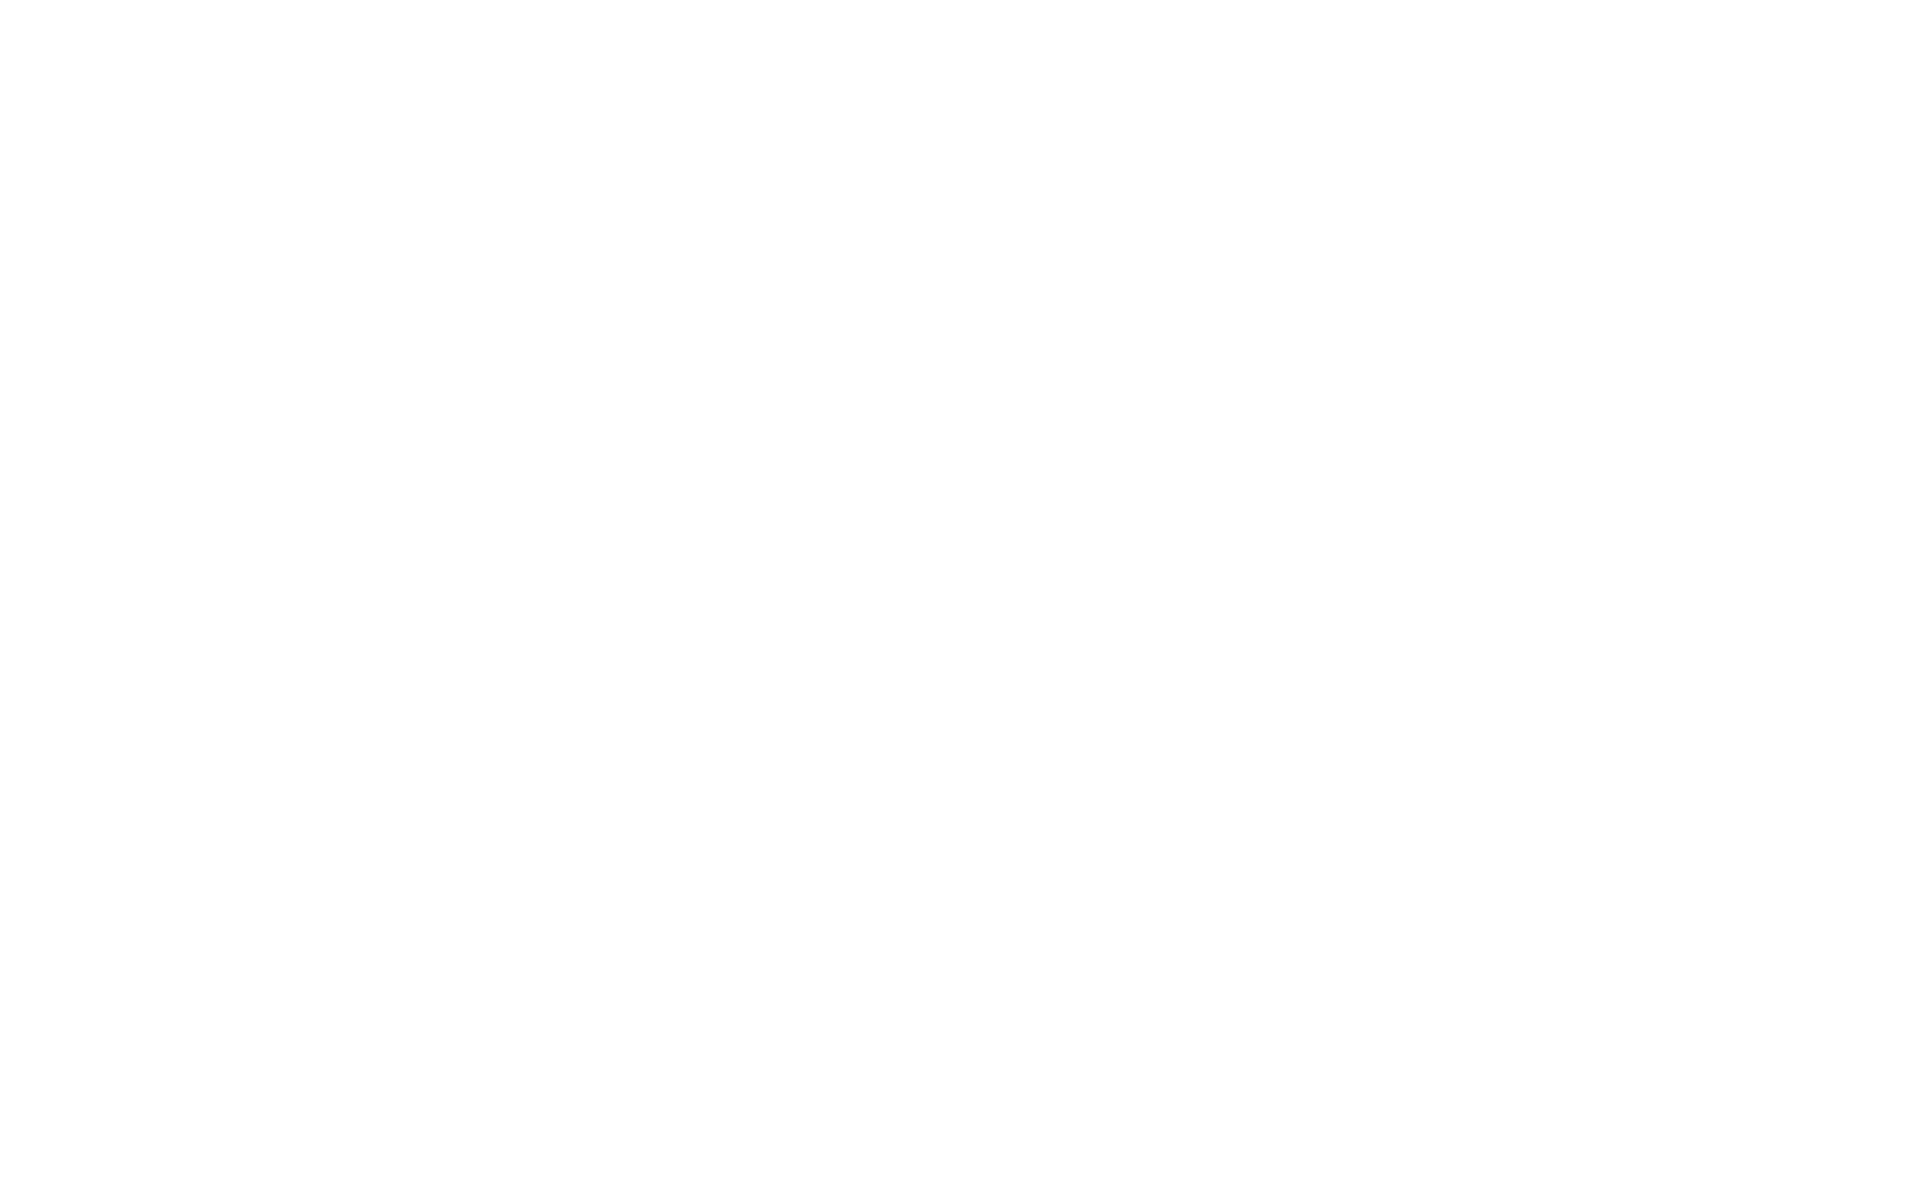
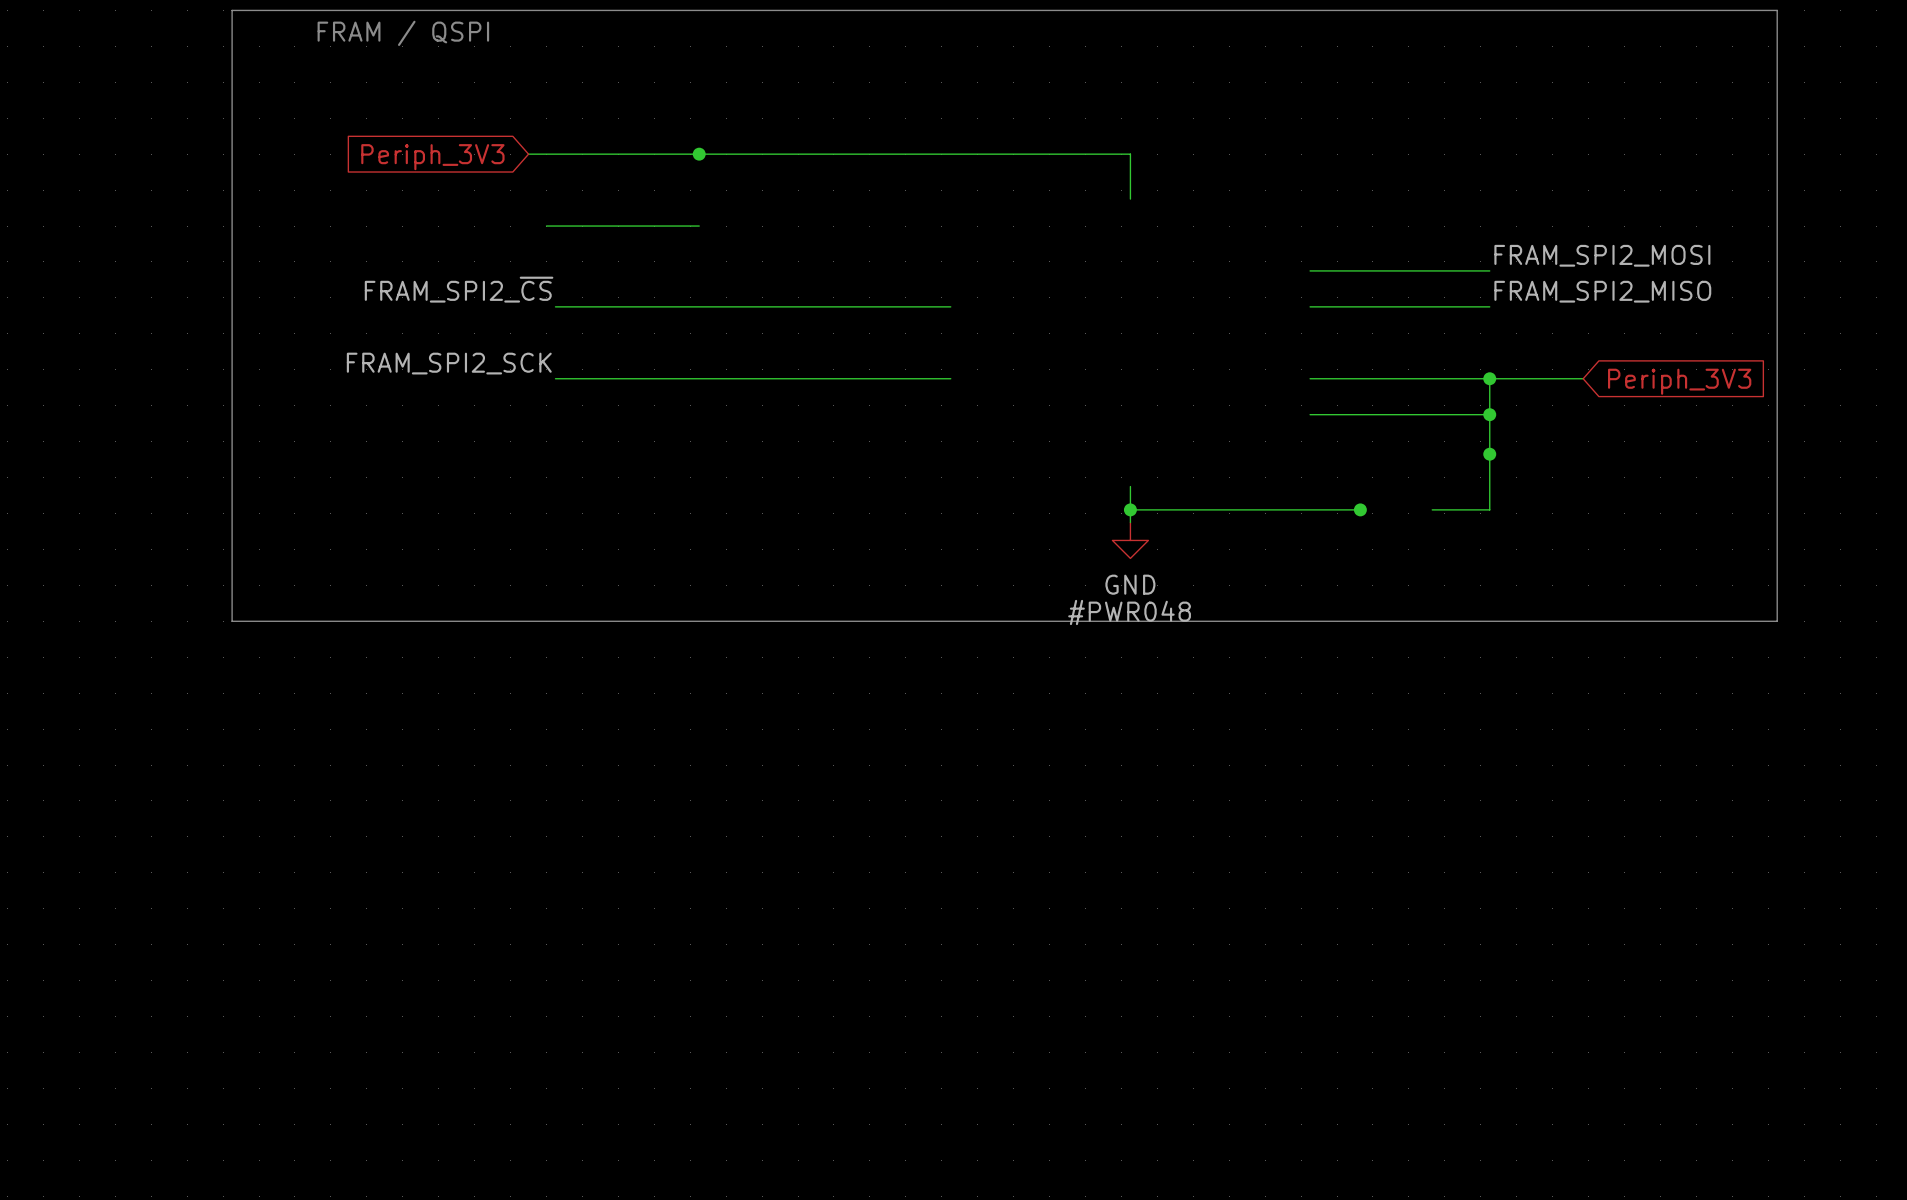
line: none -> (232, 10) (1777, 10) (1777, 621) (232, 621) (232, 10)
text: none -> FRAM / QSPI (403, 33)
wire: none -> (528, 154) (1130, 154) (1130, 199)
junction: none -> (699, 154)
global label: none -> Periph_3V3 (432, 157)
wire: none -> (546, 226) (699, 226)
label: none -> FRAM_SPI2_MOSI (1602, 255)
wire: none -> (1310, 270) (1489, 270)
label: none -> FRAM_SPI2_~{CS} (459, 289)
label: none -> FRAM_SPI2_MISO (1602, 291)
wire: none -> (555, 306) (950, 306)
wire: none -> (1310, 306) (1489, 306)
label: none -> FRAM_SPI2_SCK (449, 363)
wire: none -> (555, 378) (950, 378)
wire: none -> (1310, 378) (1583, 378)
wire: none -> (1489, 378) (1489, 509) (1432, 509)
junction: none -> (1489, 378)
global label: none -> Periph_3V3 (1679, 381)
wire: none -> (1310, 414) (1489, 414)
junction: none -> (1489, 414)
junction: none -> (1489, 454)
wire: none -> (1130, 486) (1130, 522)
wire: none -> (1130, 509) (1362, 509)
junction: none -> (1130, 509)
junction: none -> (1360, 509)
#PWR048: none -> GND (1130, 540)

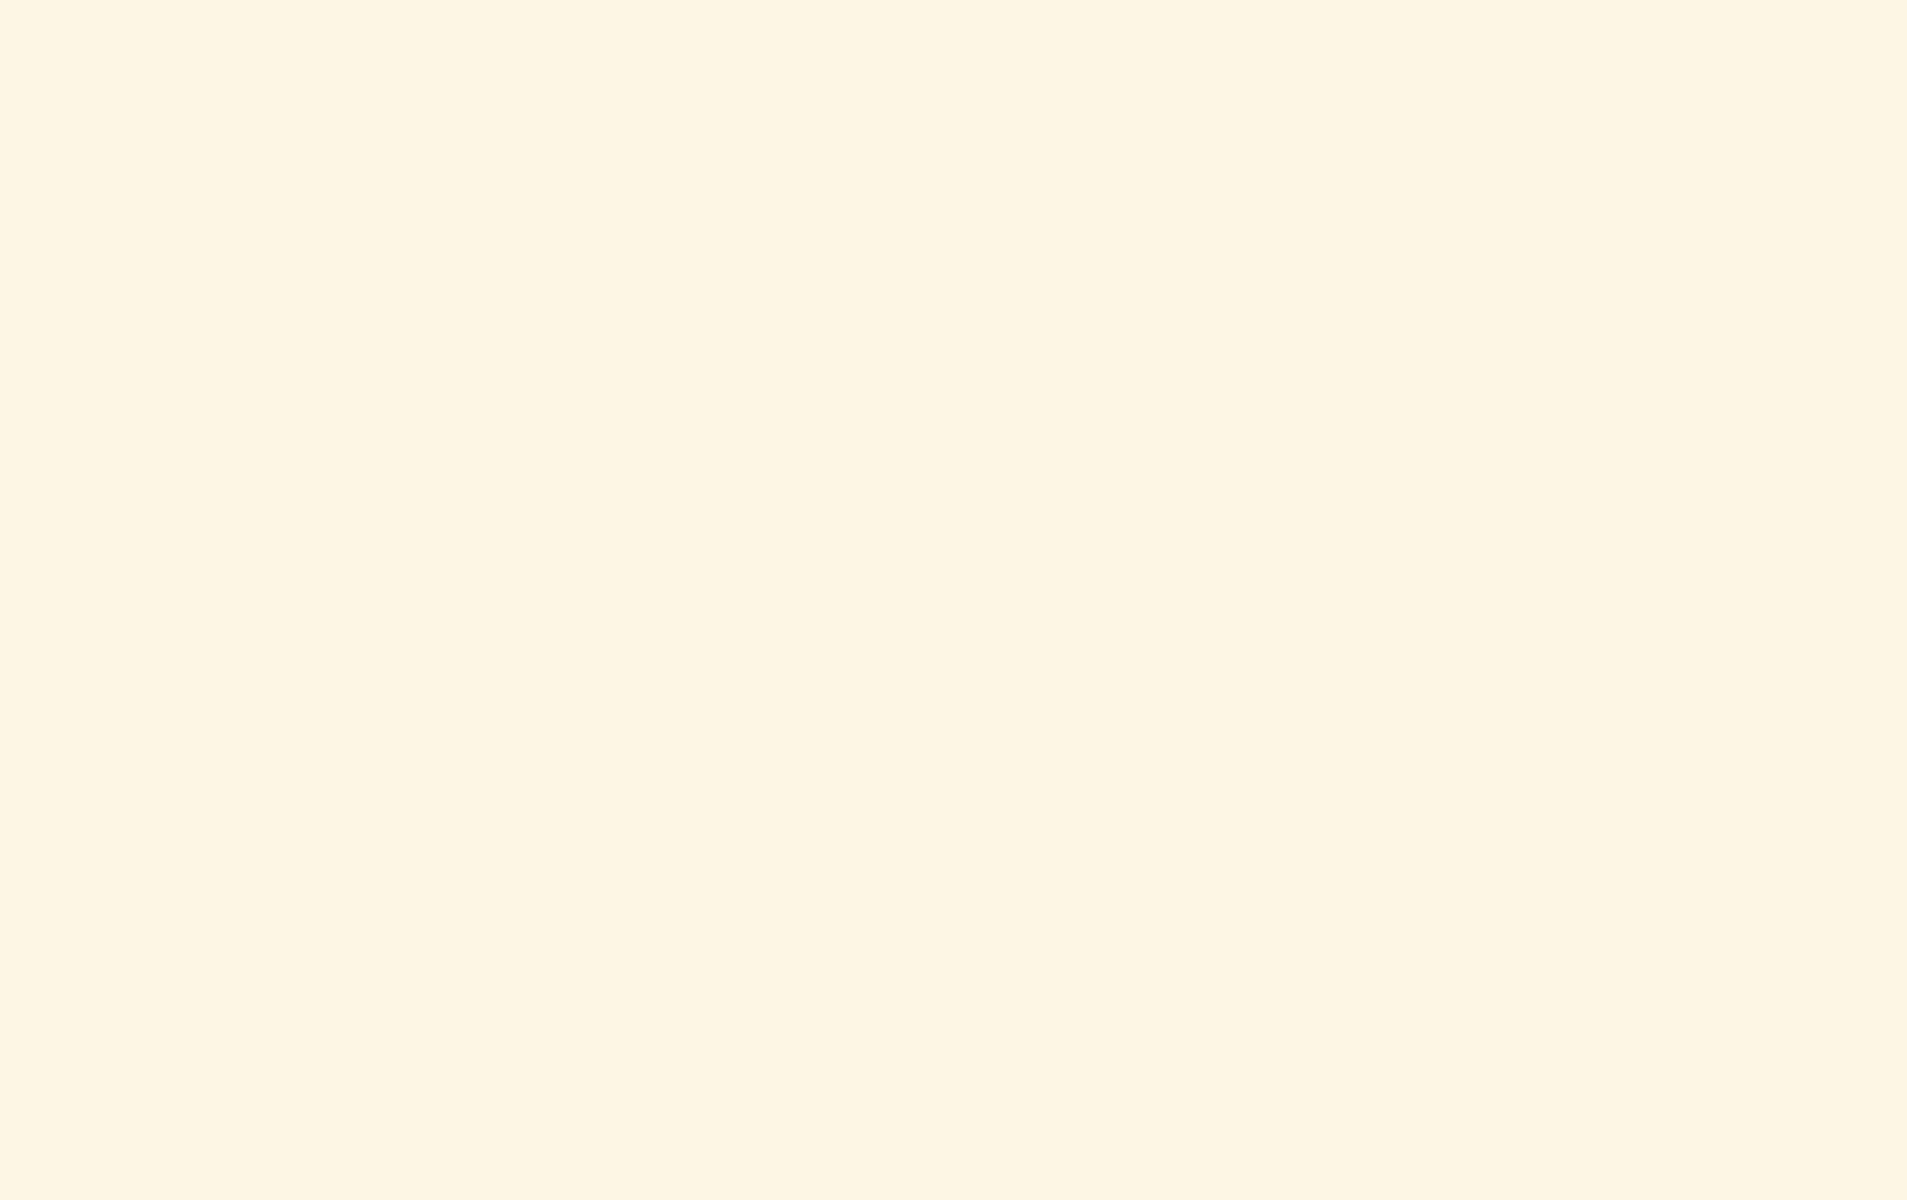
line: (232, 10) (1777, 10) (1777, 621) (232, 621) (232, 10) -> none
text: FRAM / QSPI (403, 33) -> none
wire: (528, 154) (1130, 154) (1130, 199) -> none
junction: (699, 154) -> none
global label: Periph_3V3 (432, 157) -> none
wire: (546, 226) (699, 226) -> none
label: FRAM_SPI2_MOSI (1602, 255) -> none
wire: (1310, 270) (1489, 270) -> none
label: FRAM_SPI2_~{CS} (459, 289) -> none
label: FRAM_SPI2_MISO (1602, 291) -> none
wire: (555, 306) (950, 306) -> none
wire: (1310, 306) (1489, 306) -> none
label: FRAM_SPI2_SCK (449, 363) -> none
wire: (555, 378) (950, 378) -> none
wire: (1310, 378) (1583, 378) -> none
wire: (1489, 378) (1489, 509) (1432, 509) -> none
junction: (1489, 378) -> none
global label: Periph_3V3 (1679, 381) -> none
wire: (1310, 414) (1489, 414) -> none
junction: (1489, 414) -> none
junction: (1489, 454) -> none
wire: (1130, 486) (1130, 522) -> none
wire: (1130, 509) (1362, 509) -> none
junction: (1130, 509) -> none
junction: (1360, 509) -> none
#PWR048: GND (1130, 540) -> none

